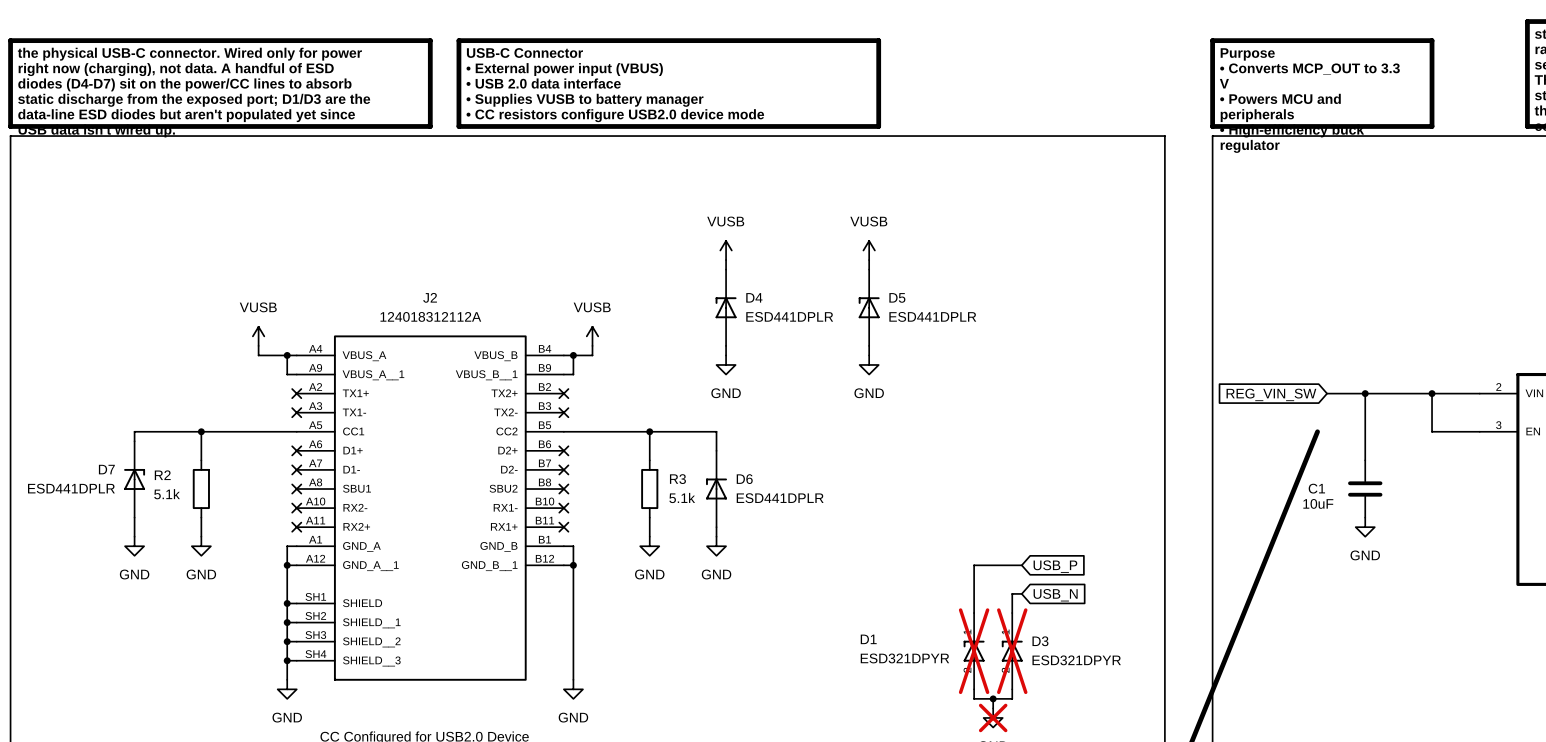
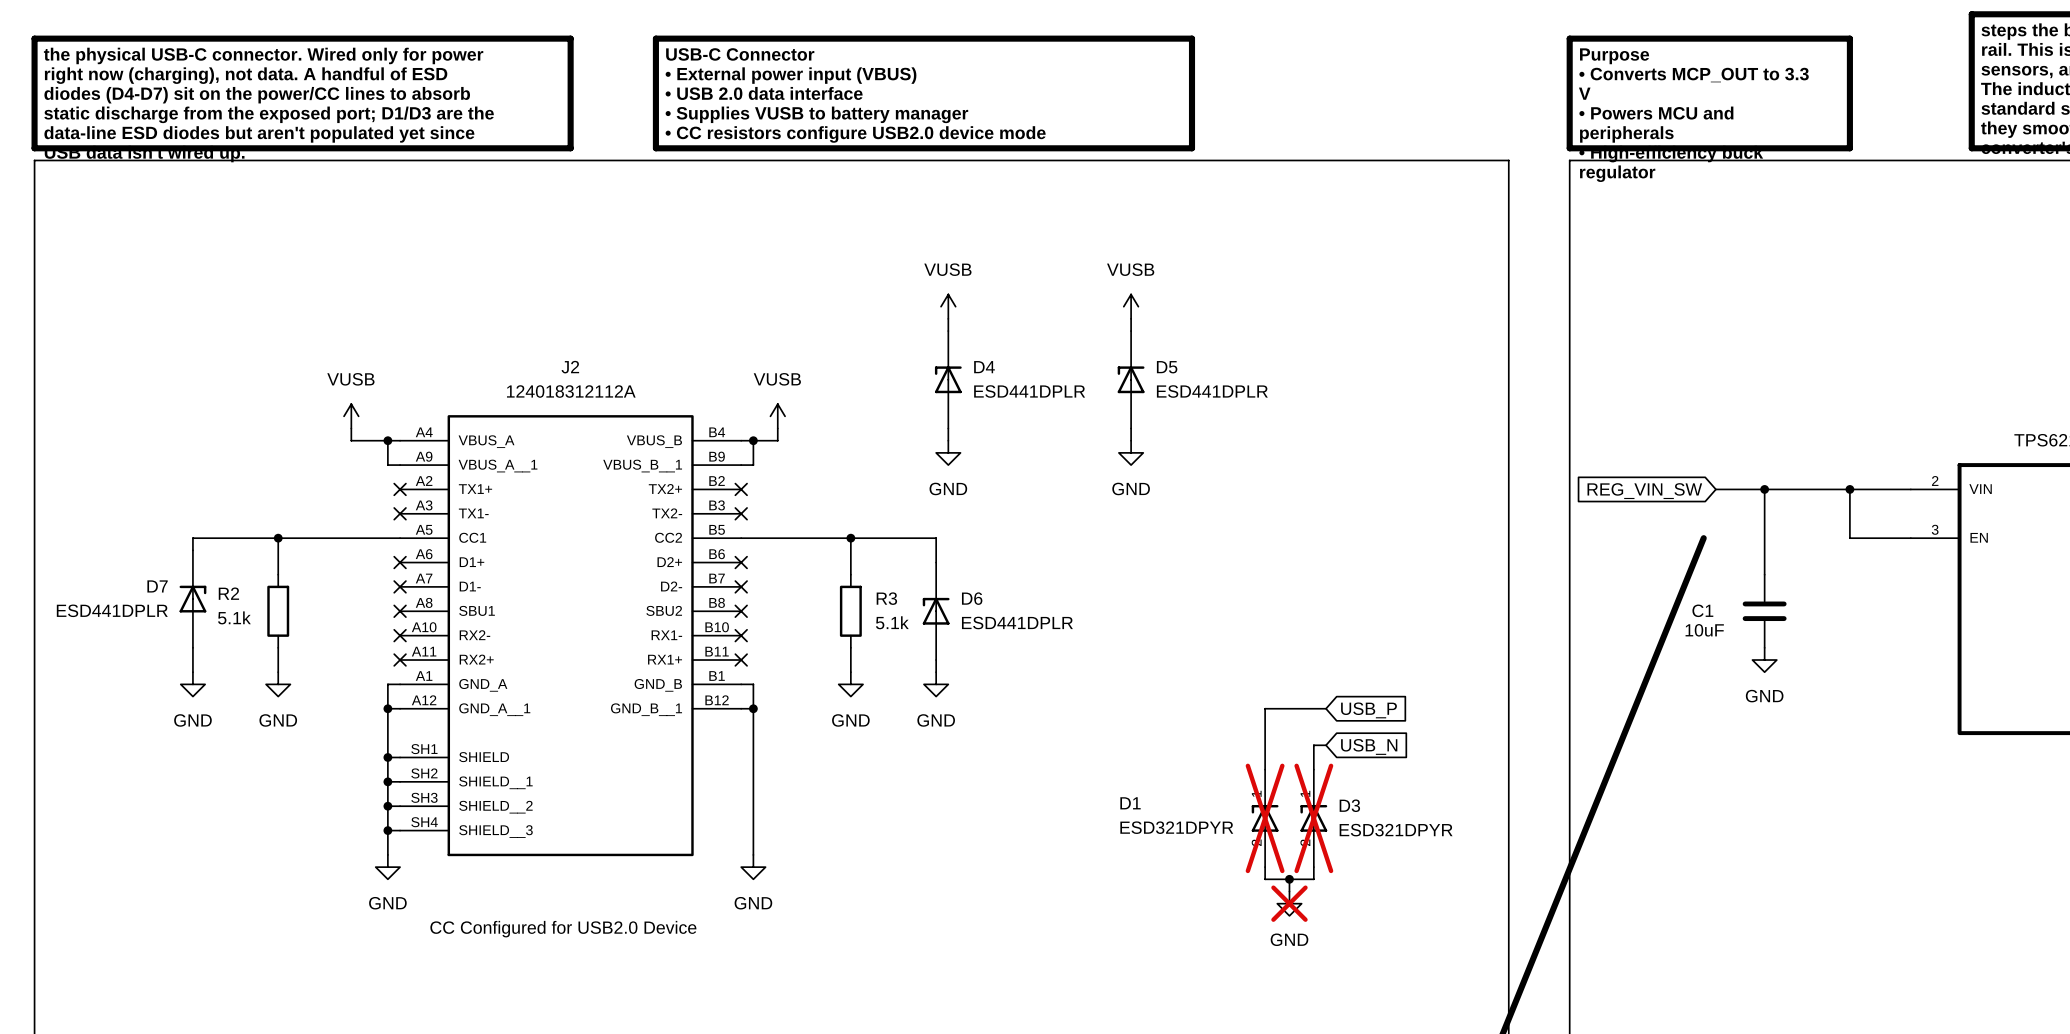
line: (497, 40) (458, 40) (458, 126) (497, 126) -> (655, 38) (655, 148)
line: (878, 40) (878, 126) -> (1143, 38) (1192, 38) (1192, 148) (1143, 148)
text position: USB-C Connector (524, 53) -> USB-C Connector (740, 54)
text position: • External power input (VBUS) (564, 69) -> • External power input (VBUS) (791, 75)
text position: • USB 2.0 data interface (543, 83) -> • USB 2.0 data interface (764, 93)
text position: • Supplies VUSB to battery manager (584, 100) -> • Supplies VUSB to battery manager (816, 114)
text position: • CC resistors configure USB2.0 device mode (615, 115) -> • CC resistors configure USB2.0 device mode (855, 134)

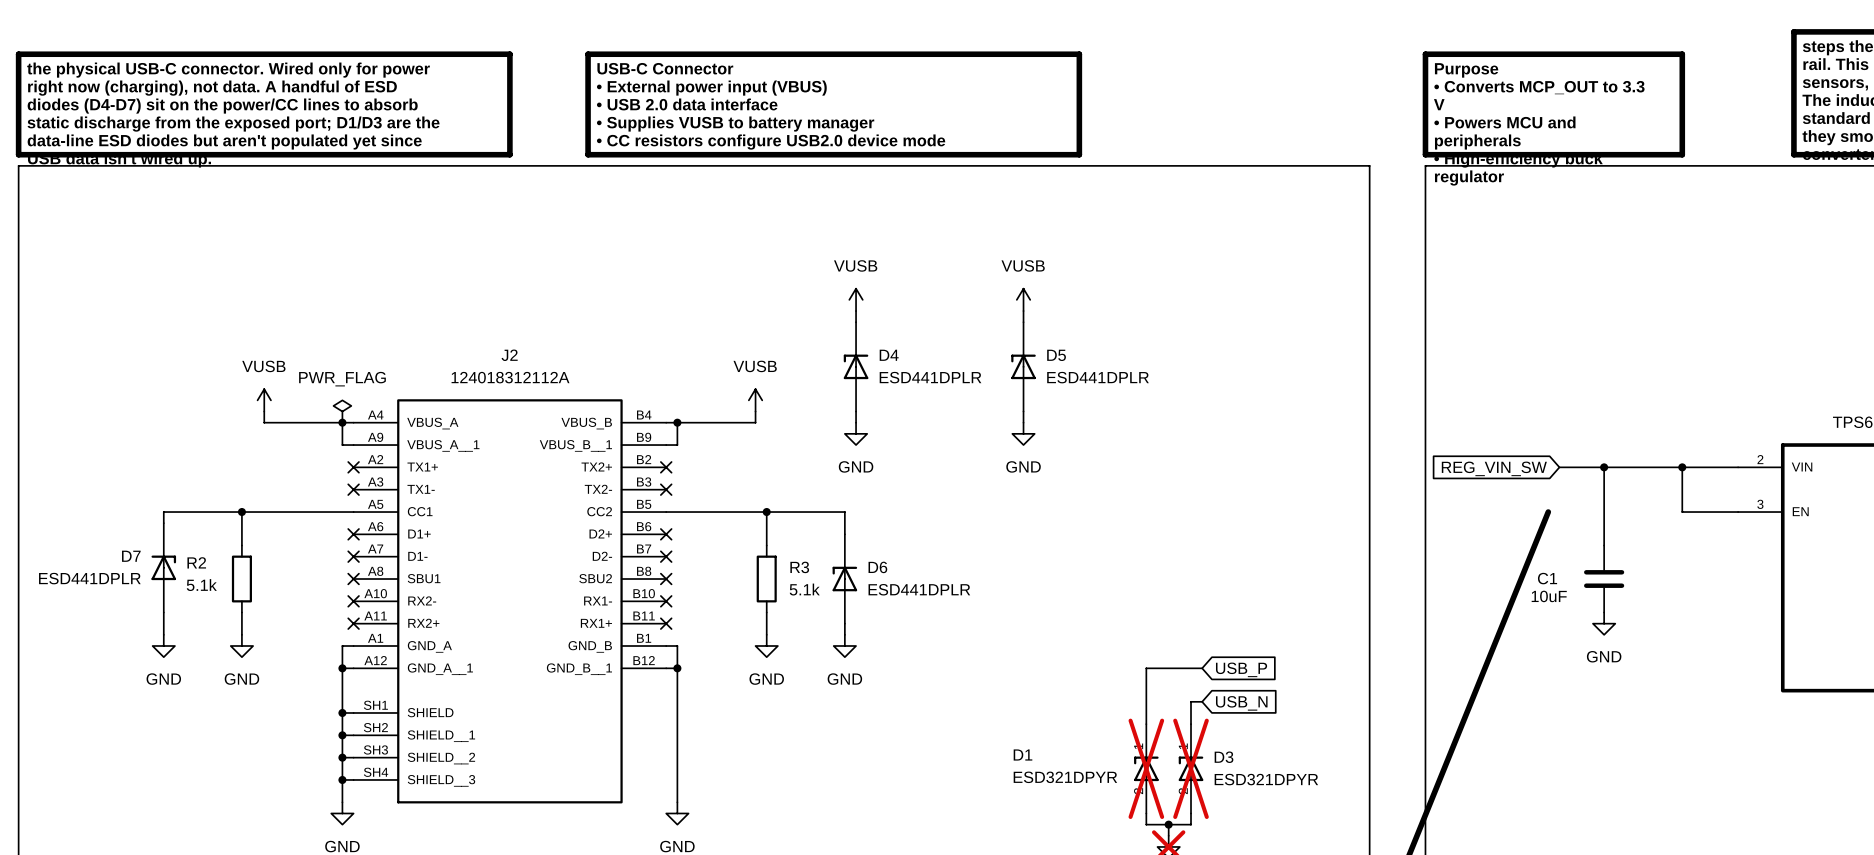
power symbol position: VUSB (351, 416) -> VUSB (264, 400)
power symbol position: VUSB (777, 416) -> VUSB (755, 400)
wire: (351, 428) (351, 440) -> (264, 411) (264, 422) (308, 422)
power symbol: none -> PWR_FLAG (342, 411)
wire: (777, 428) (777, 440) -> (755, 411) (755, 422) (699, 422)

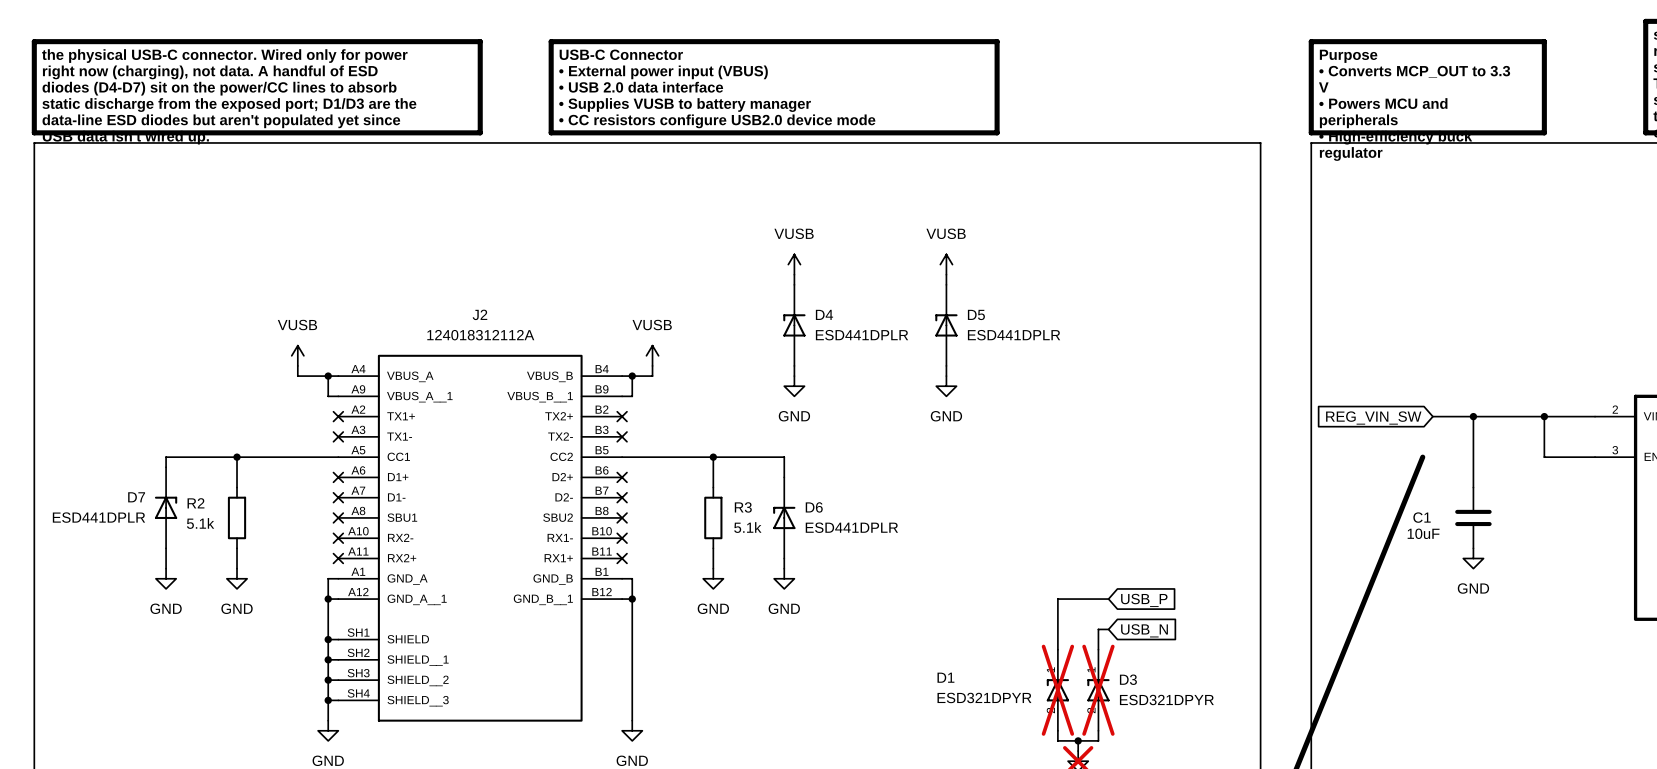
power symbol position: VUSB (264, 400) -> VUSB (297, 355)
power symbol position: VUSB (755, 400) -> VUSB (652, 355)
wire: (264, 411) (264, 422) (308, 422) -> (297, 365) (297, 376)
power symbol: PWR_FLAG (342, 411) -> none
wire: (755, 411) (755, 422) (699, 422) -> (652, 365) (652, 376)

